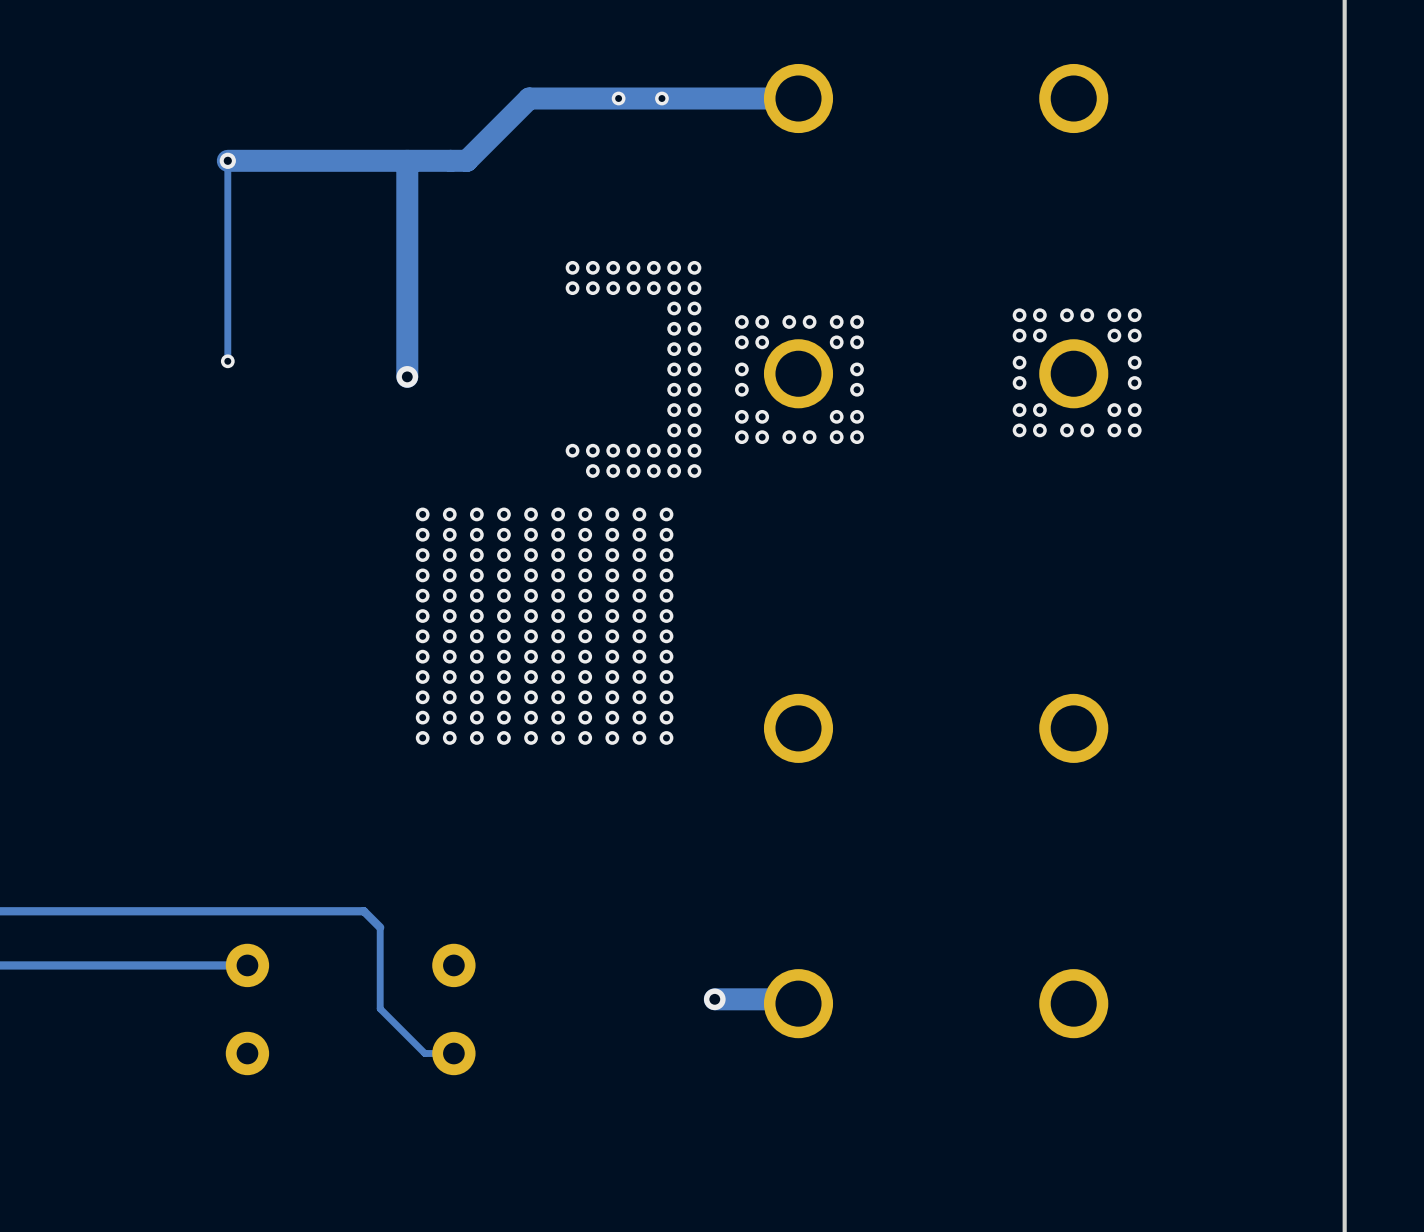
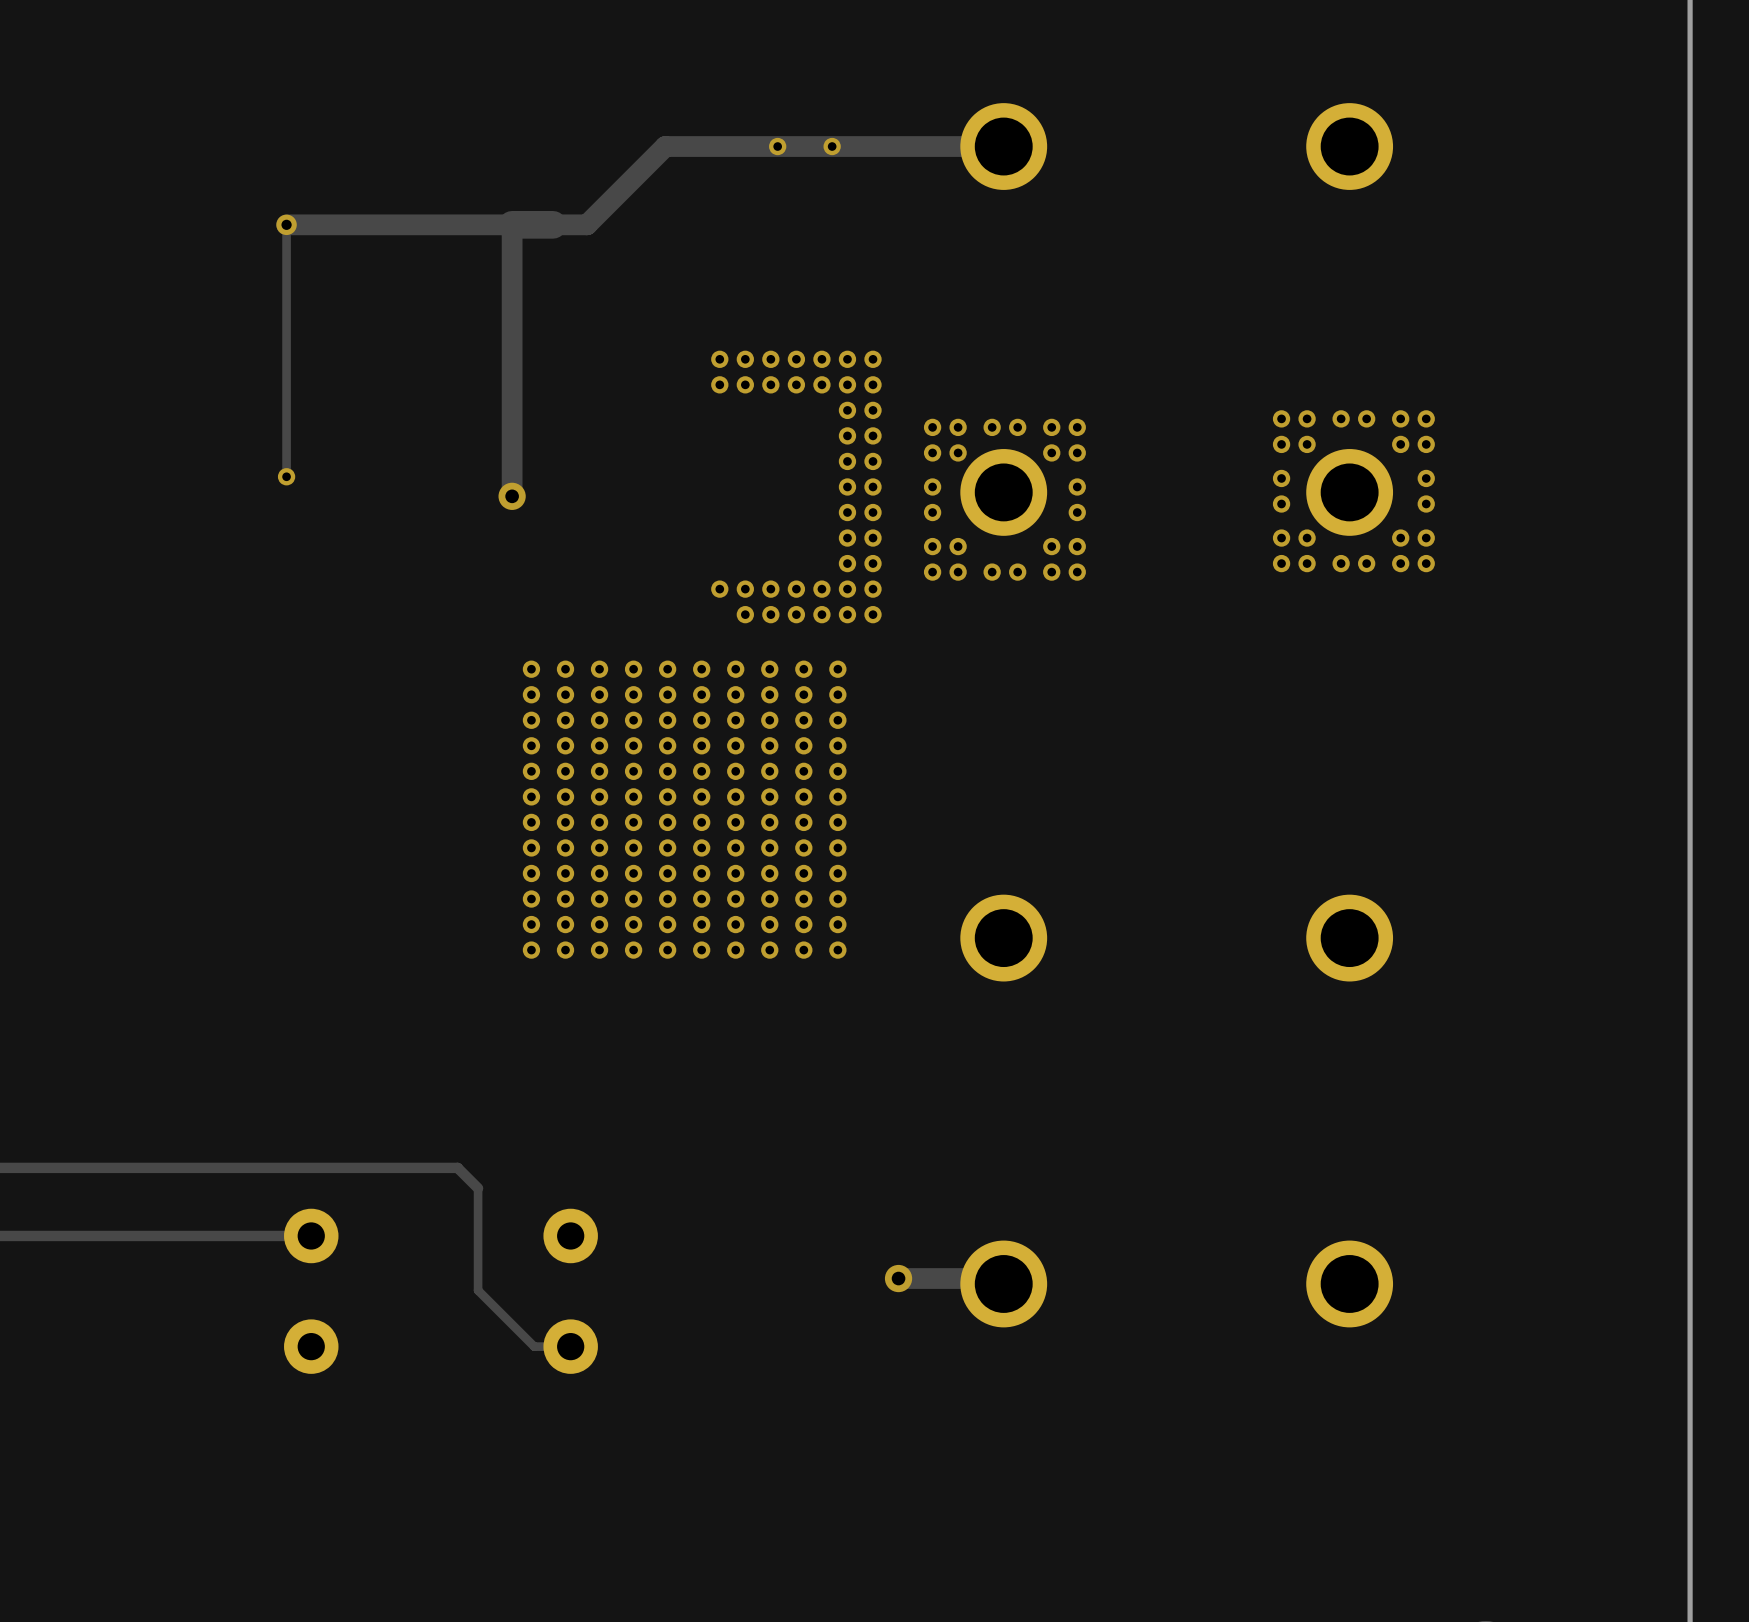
track width: thick (798, 98) (529, 98) (466, 160) (439, 160) -> thin (1003, 146) (665, 146) (587, 224) (552, 224)
track width: thick (227, 160) (407, 160) (407, 376) -> thin (286, 224) (512, 224) (512, 496)
track width: thick (794, 999) (714, 999) -> thin (998, 1278) (898, 1278)

